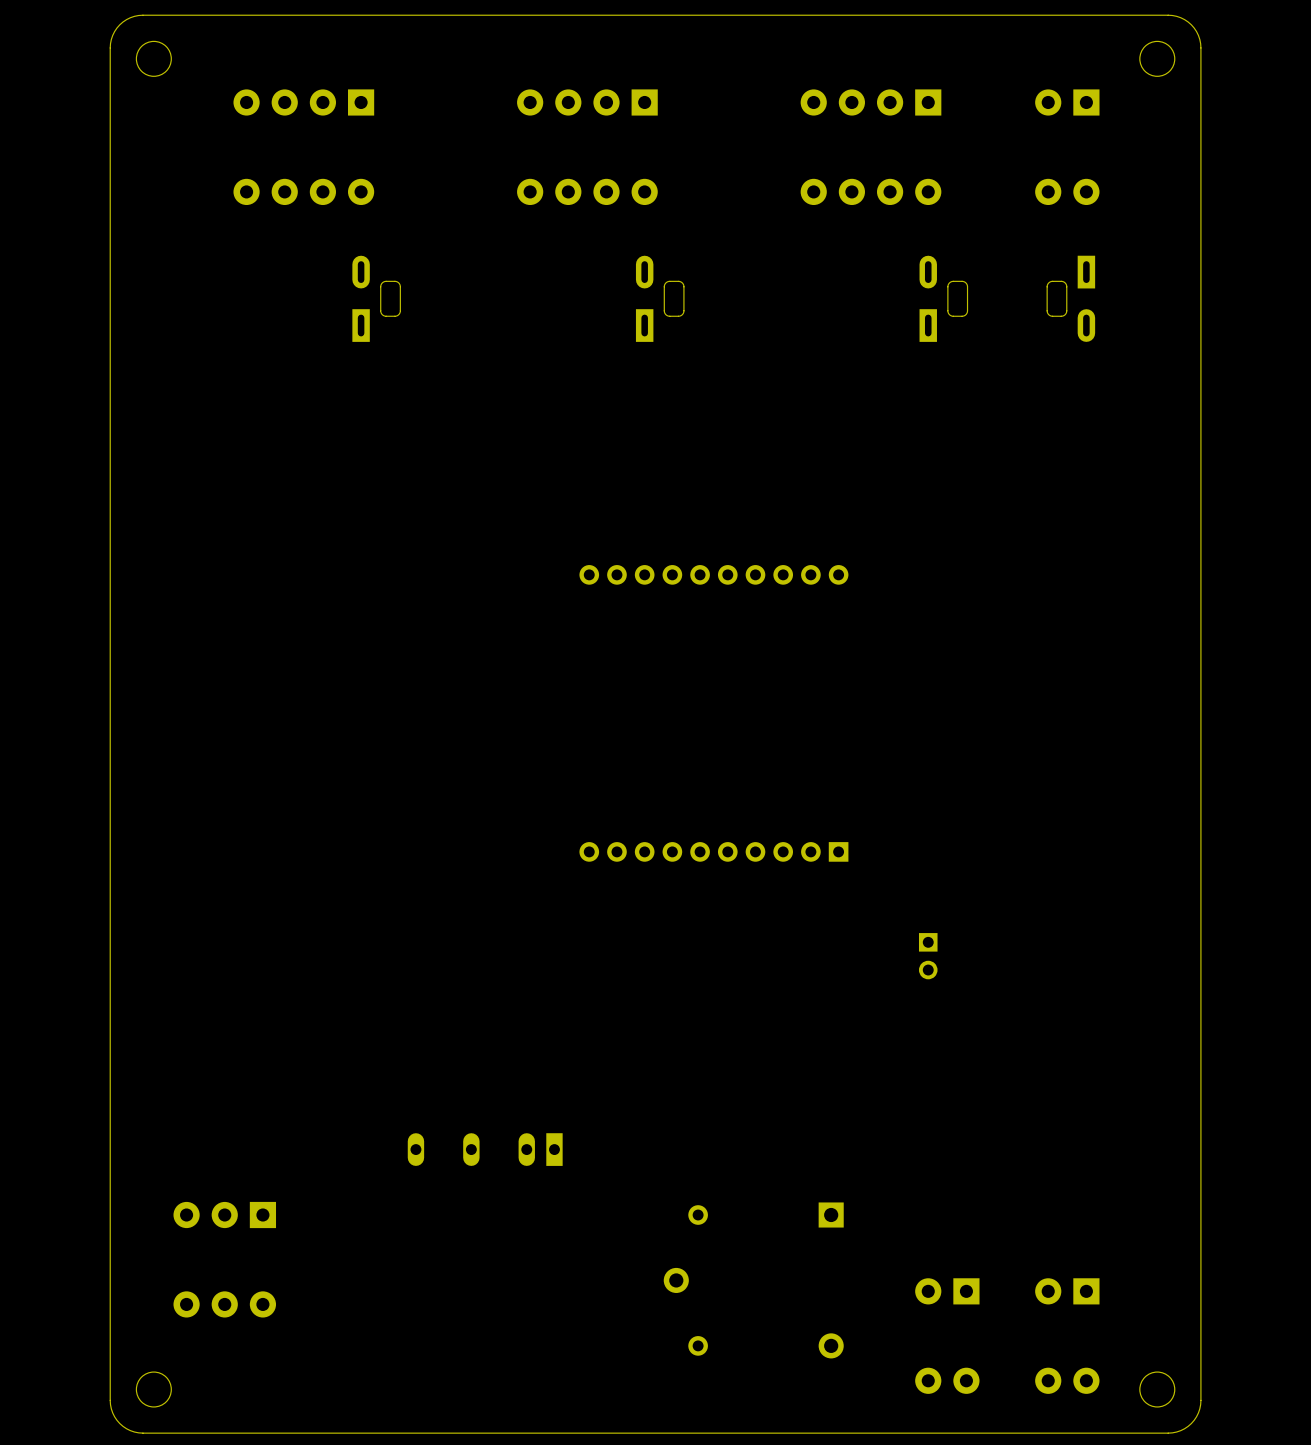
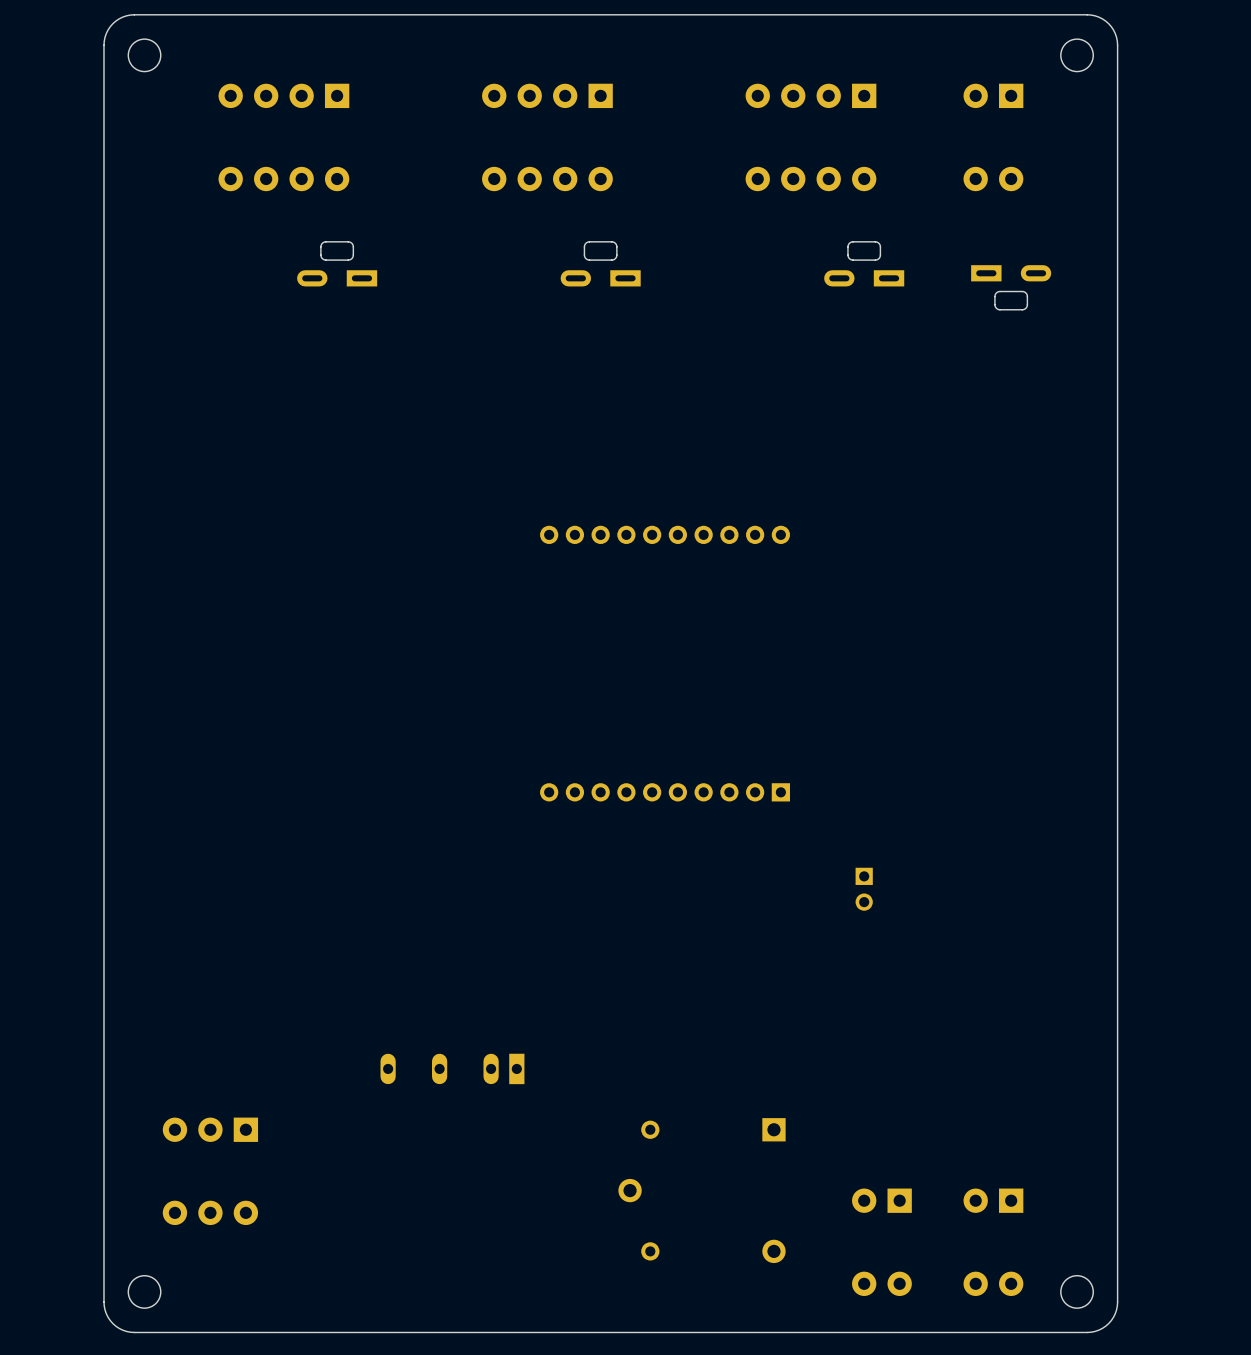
part rotation: 0° (376, 298) -> 90° counterclockwise (337, 264)
part rotation: 0° (660, 298) -> 90° counterclockwise (600, 264)
part rotation: 0° (943, 298) -> 90° counterclockwise (864, 264)
part rotation: 0° (1071, 298) -> 90° counterclockwise (1011, 287)

